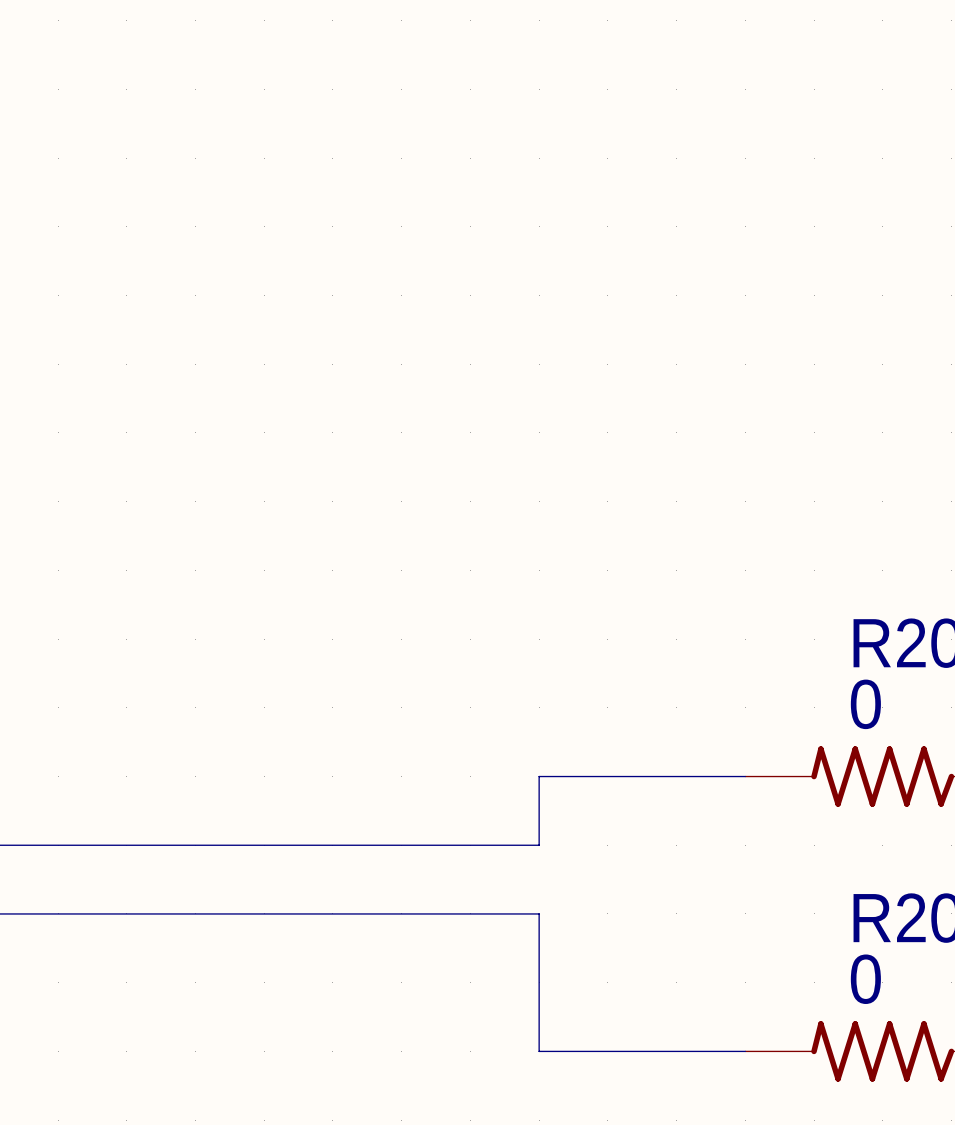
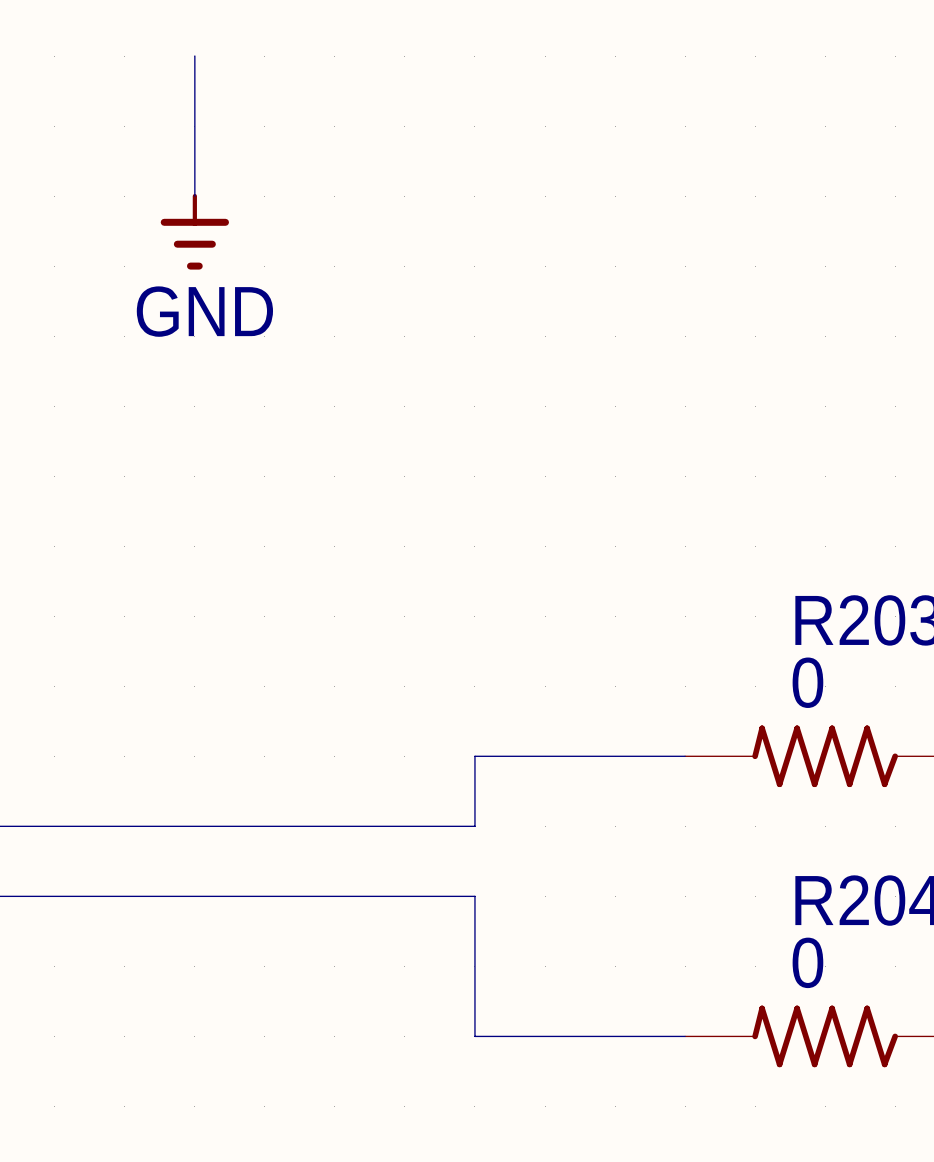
wire: none -> (194, 56) (194, 196)
power symbol: none -> GND (194, 231)

